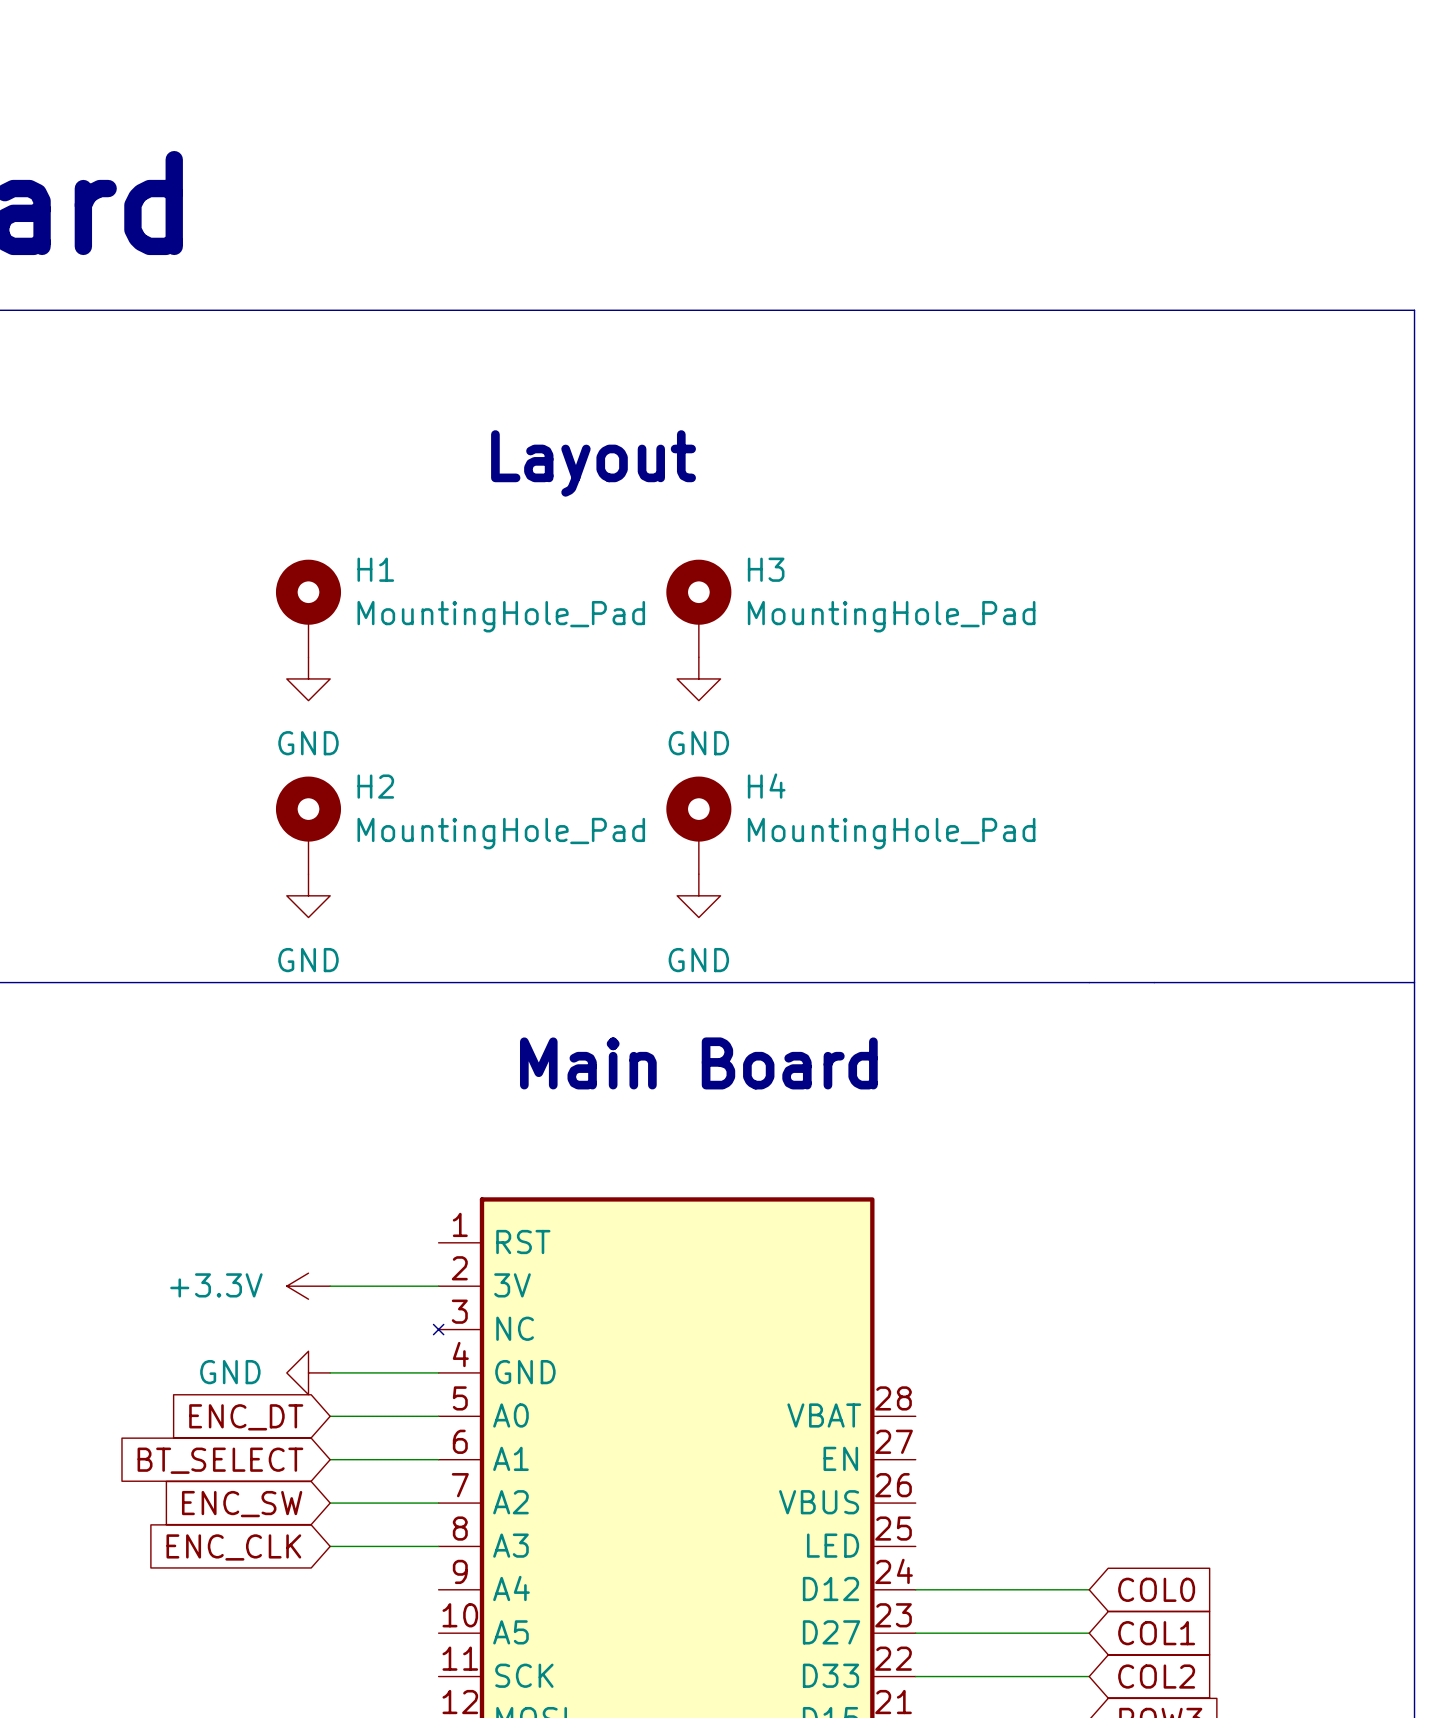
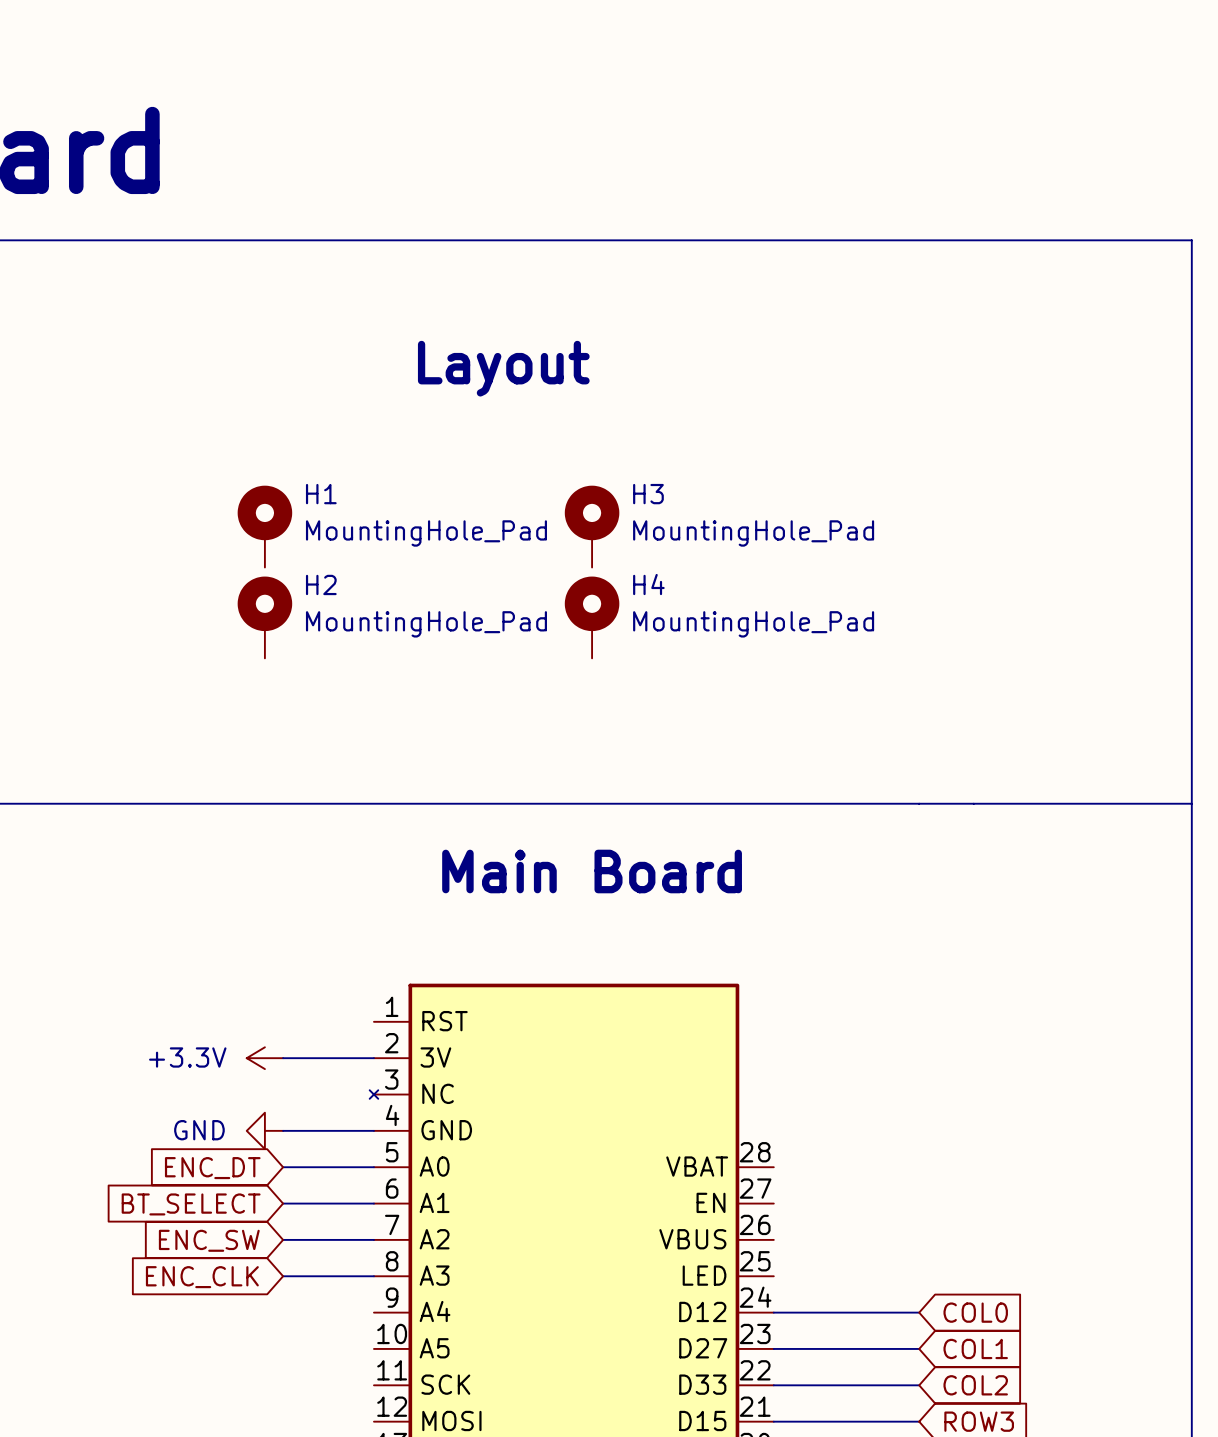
H1 position: (308, 608) -> (264, 526)
H3 position: (698, 608) -> (592, 526)
power symbol: GND (308, 678) -> none
power symbol: GND (698, 678) -> none
H2 position: (308, 825) -> (264, 617)
H4 position: (698, 825) -> (592, 617)
power symbol: GND (308, 895) -> none
power symbol: GND (698, 895) -> none

